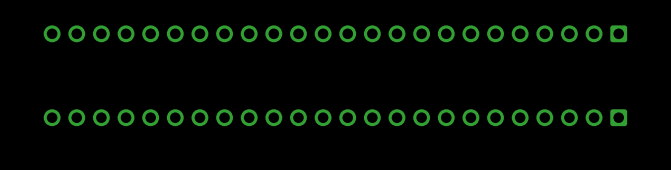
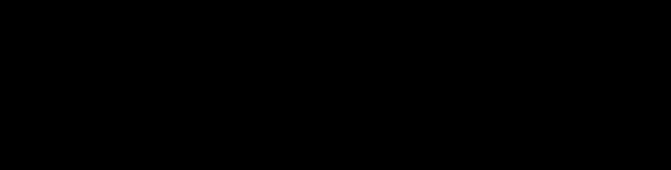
part: (335, 33) -> none
part: (335, 117) -> none

